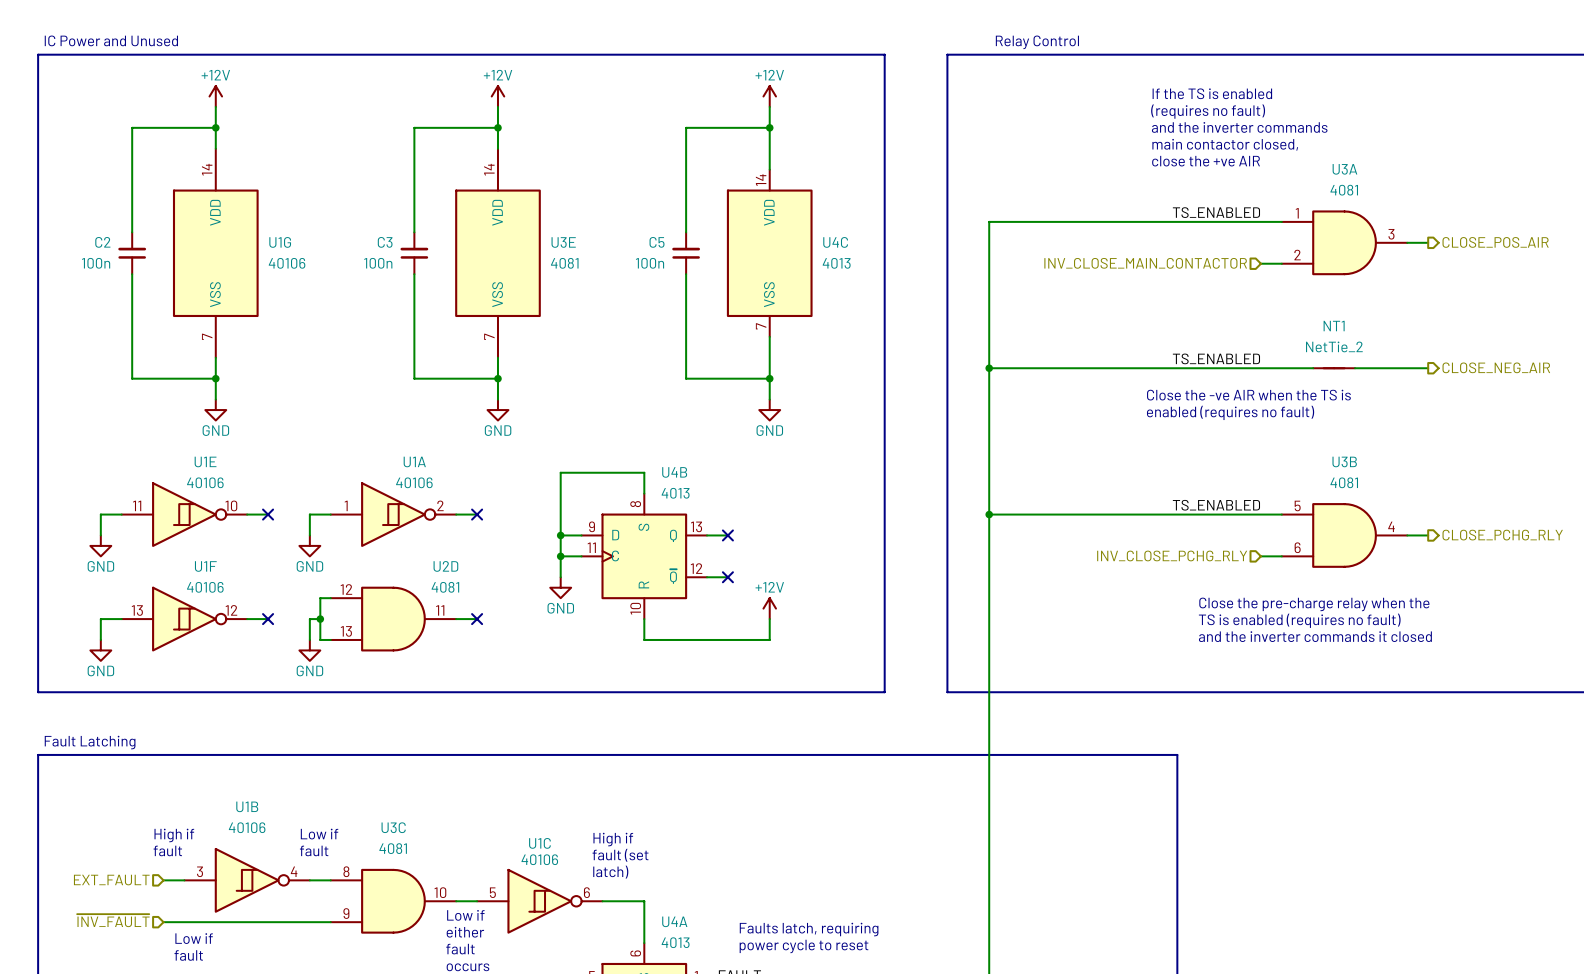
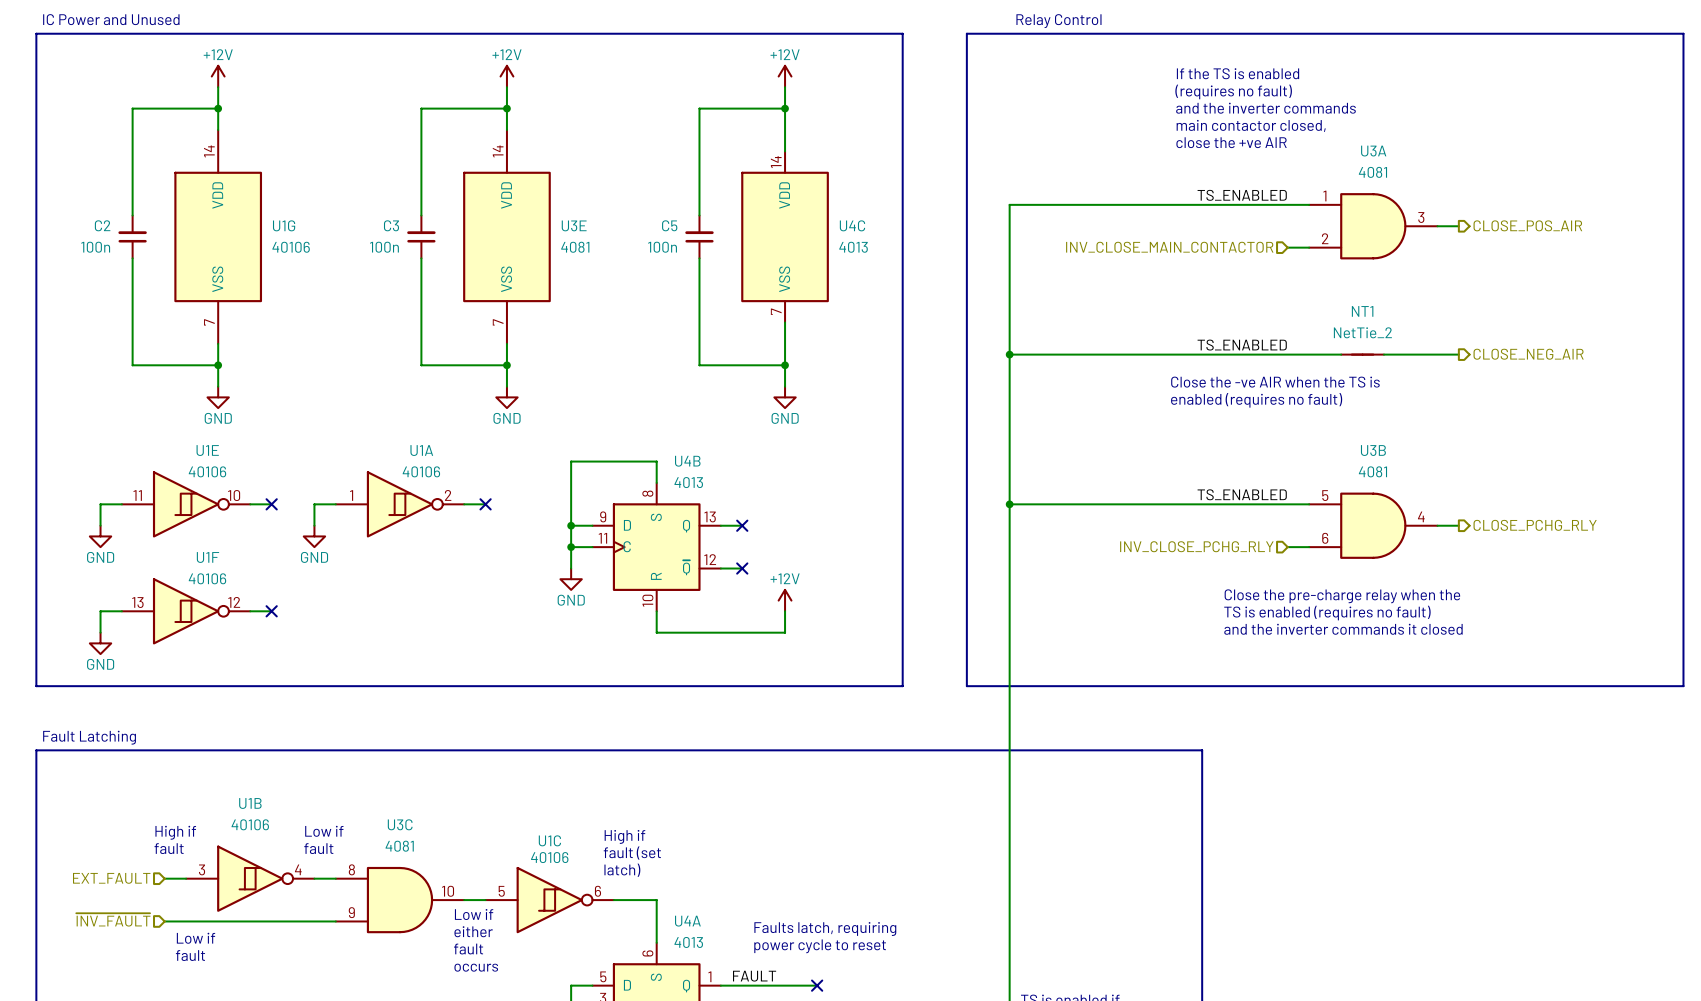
wire: (330, 598) (320, 598) (320, 639) (330, 639) -> none
wire: (320, 619) (309, 619) (309, 639) -> none
junction: (320, 619) -> none
U2D: 4081 (393, 619) -> none
wire: (456, 619) (477, 619) -> none
no-connect mark: (477, 619) -> none
power symbol: GND (309, 650) -> none

